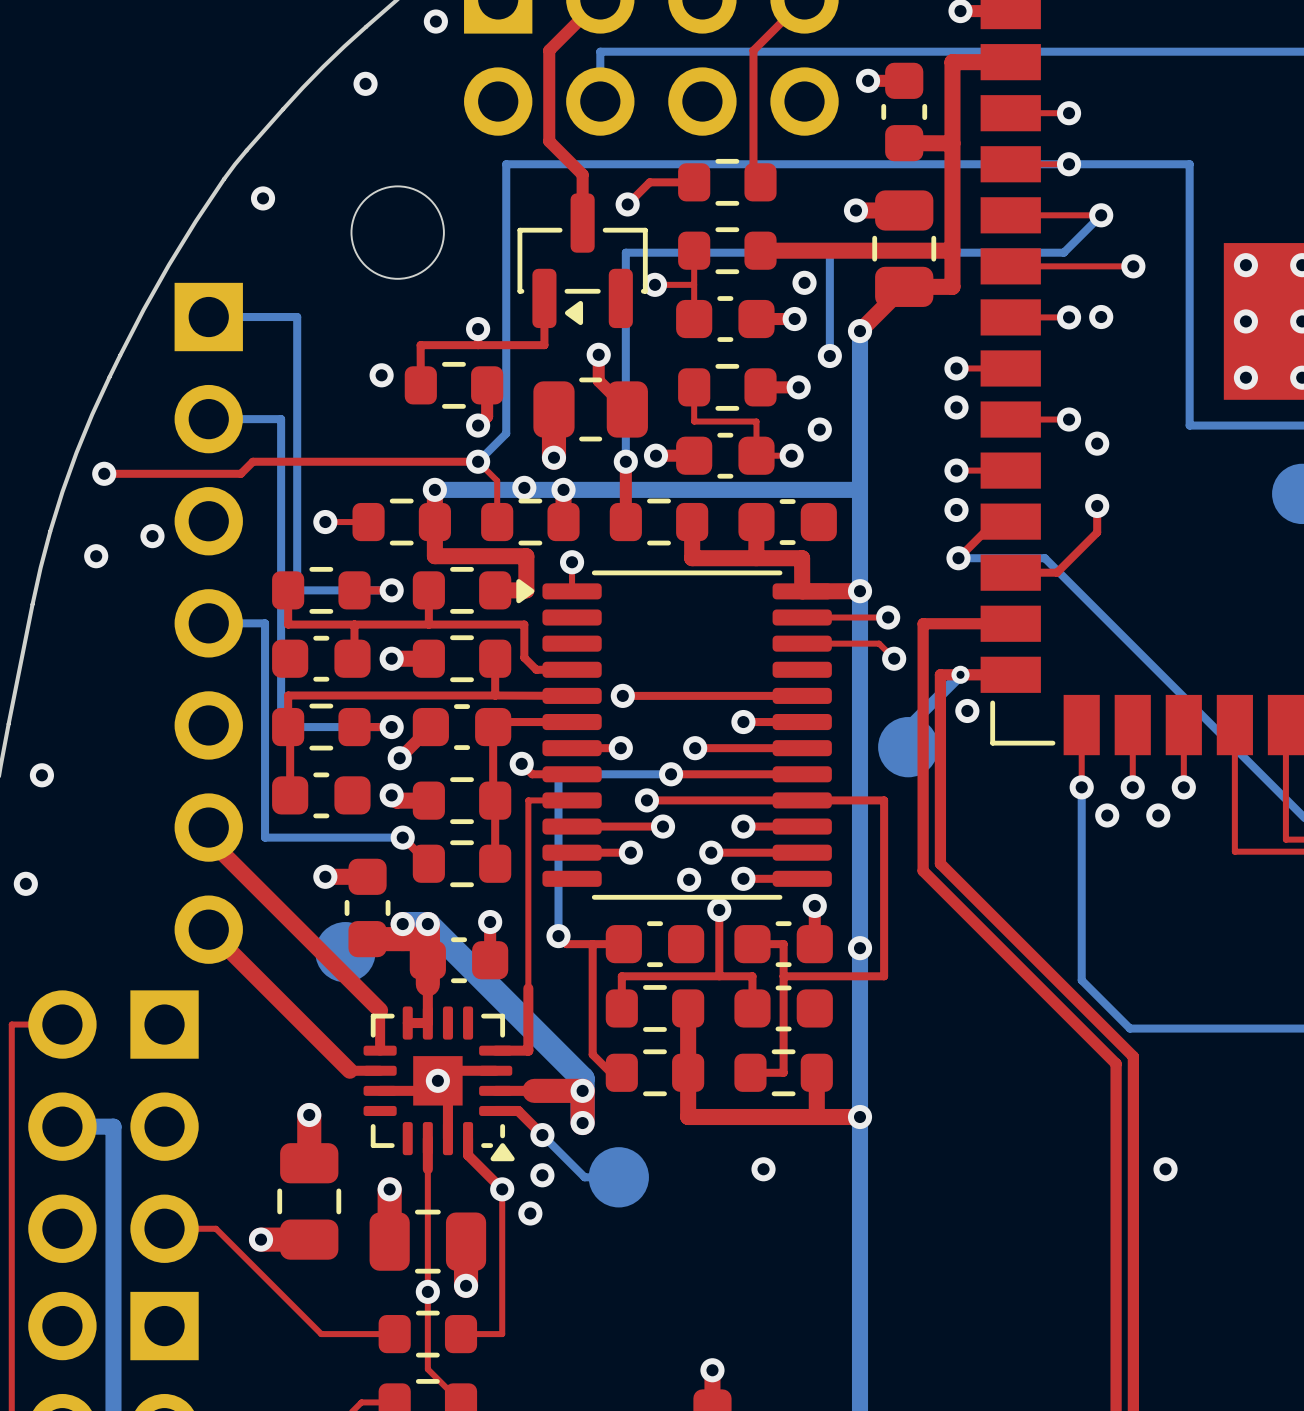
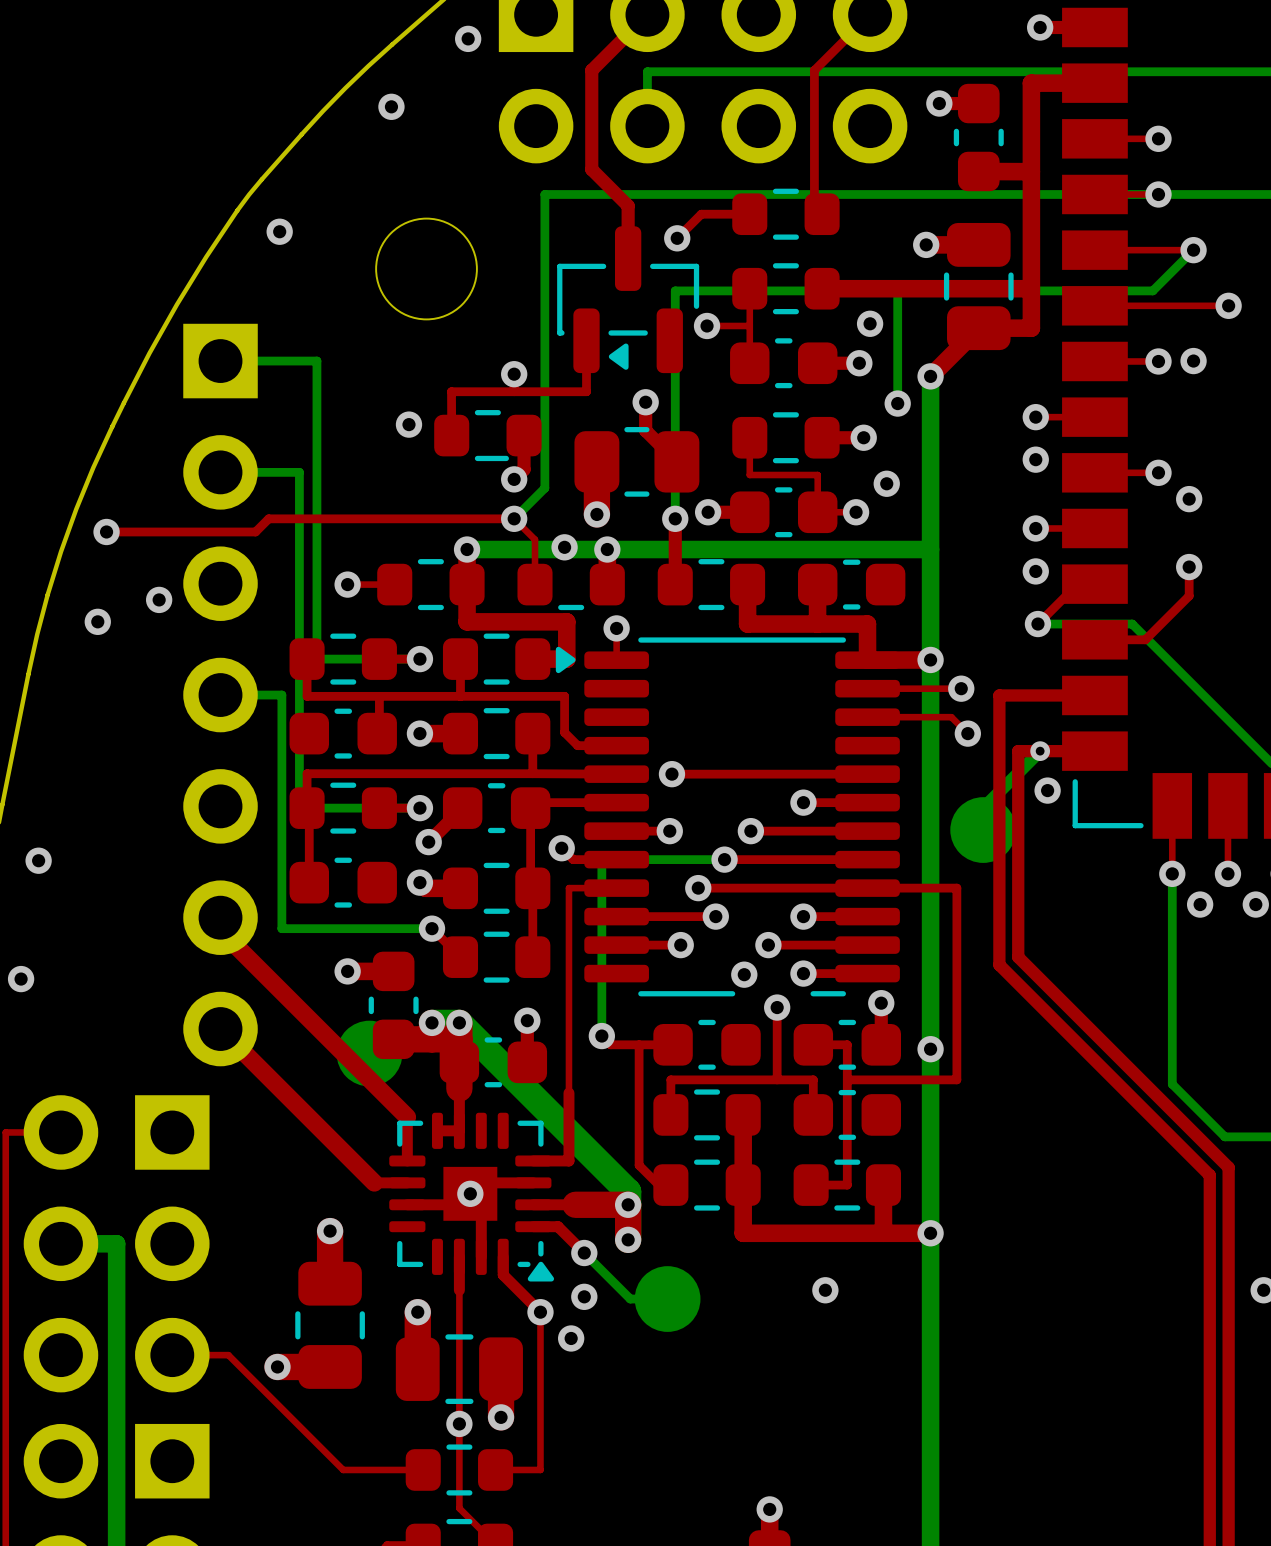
part footprint: [517, 193, 648, 329] -> [557, 226, 700, 374]
part footprint: [404, 361, 504, 409] -> [434, 410, 542, 462]
part footprint: [481, 498, 580, 546] -> [517, 563, 625, 611]
part footprint: [516, 570, 832, 900] -> [555, 637, 900, 997]

